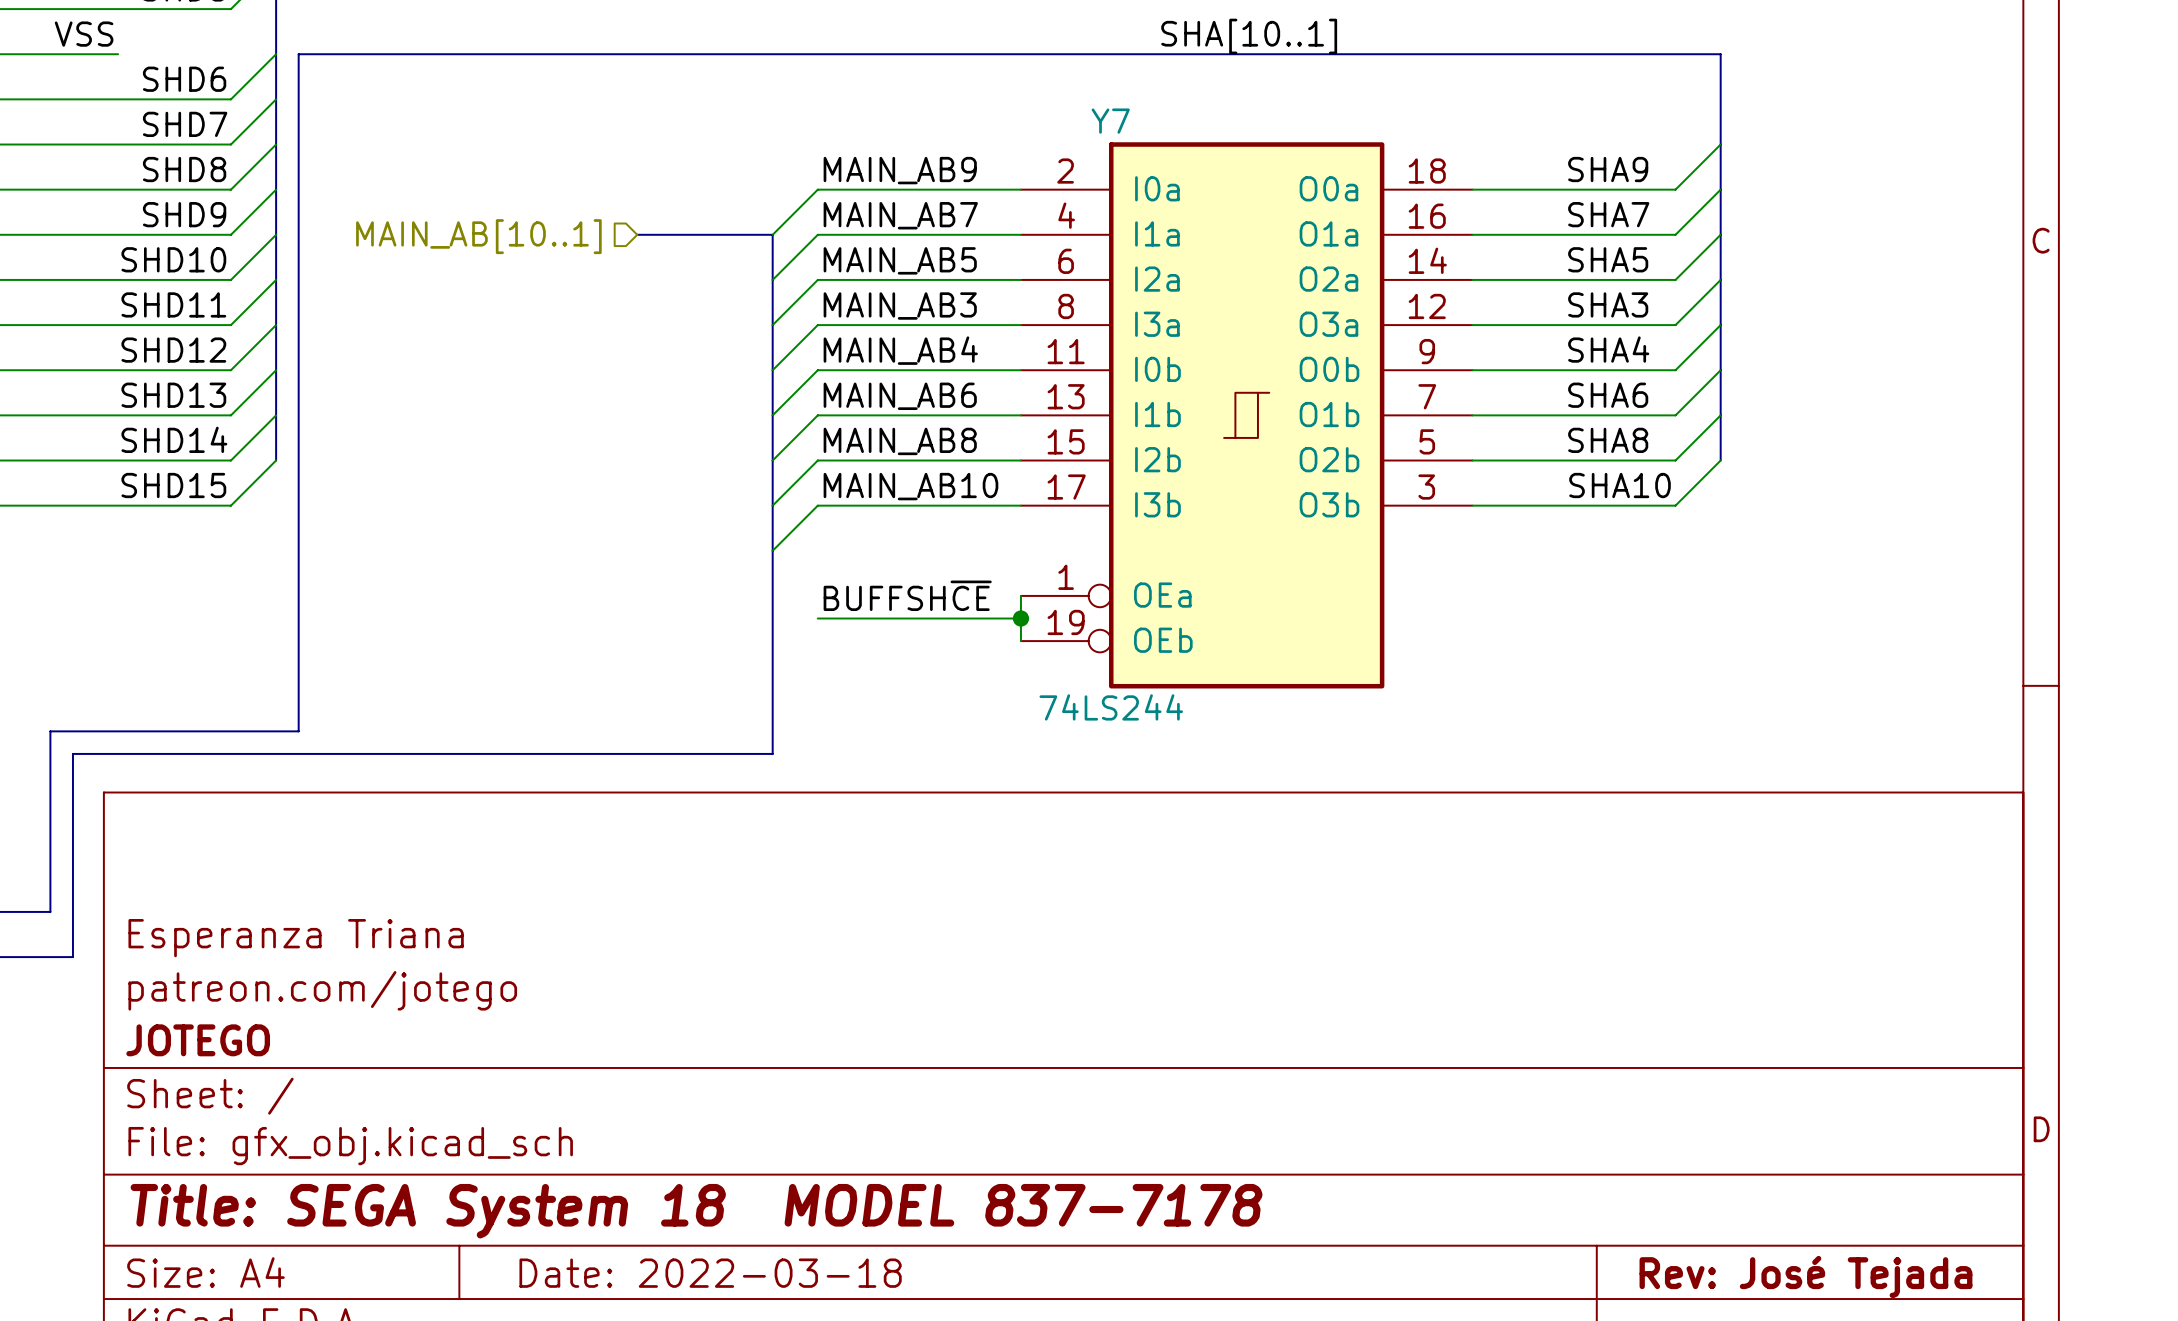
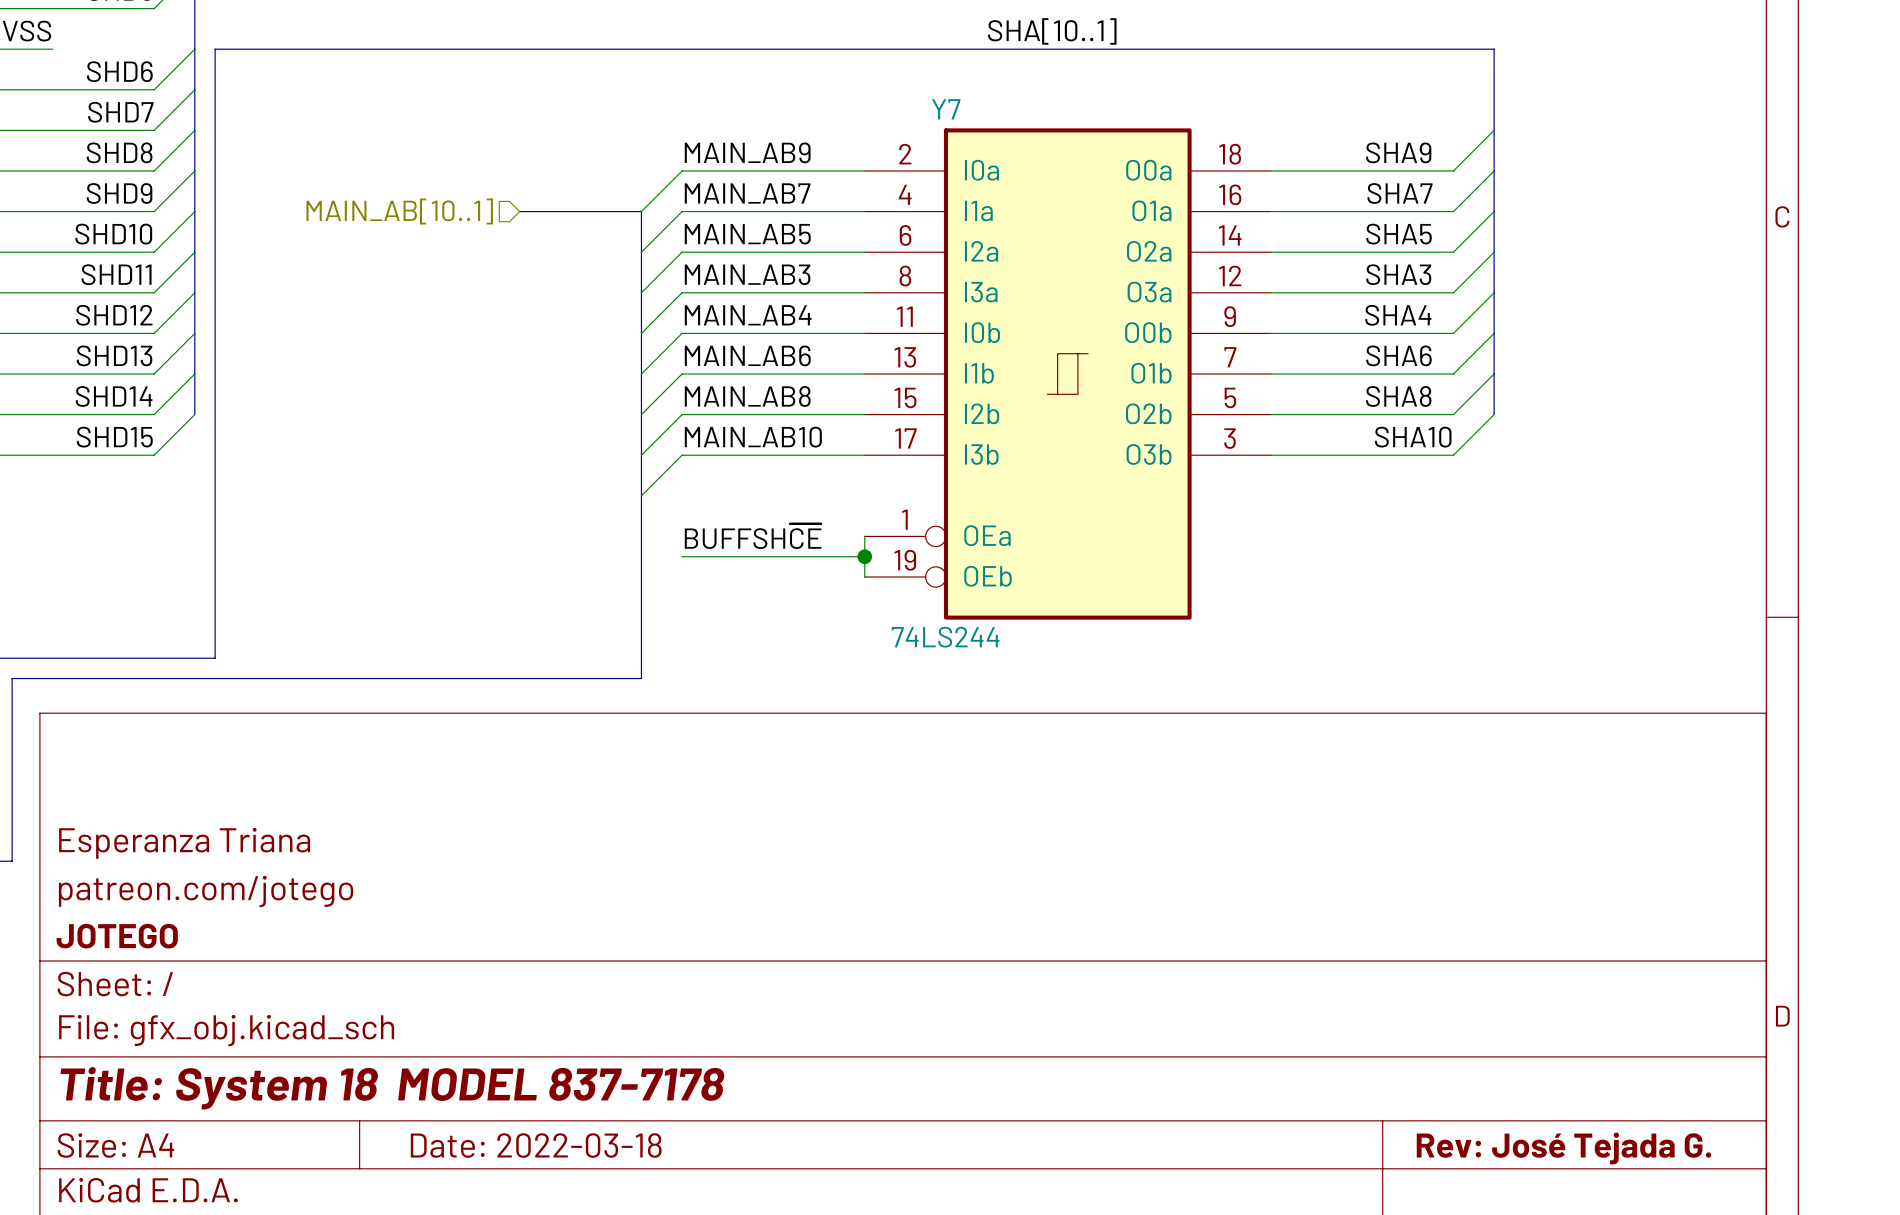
title block: Title: SEGA System 18 MODEL 837-7178 (696, 1211) -> Title: System 18 MODEL 837-7178 (392, 1088)
title block: Rev: José Tejada (1805, 1276) -> Rev: José Tejada G. (1564, 1148)

